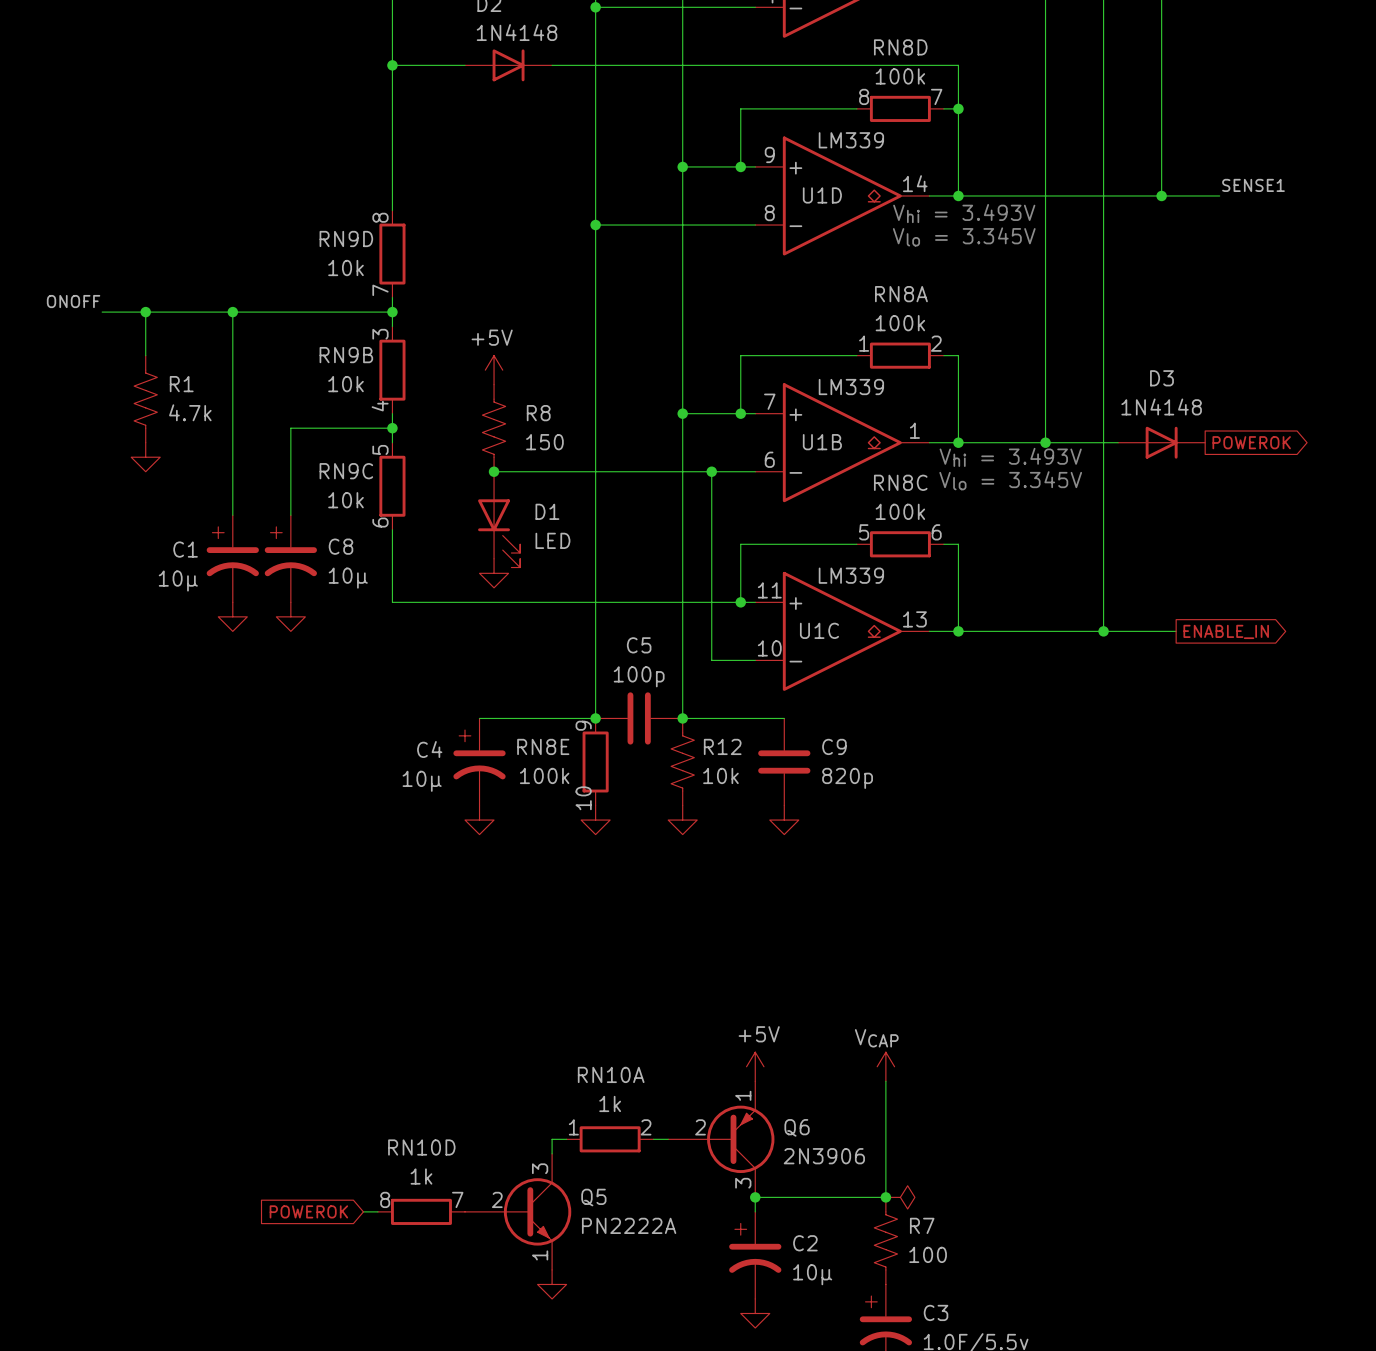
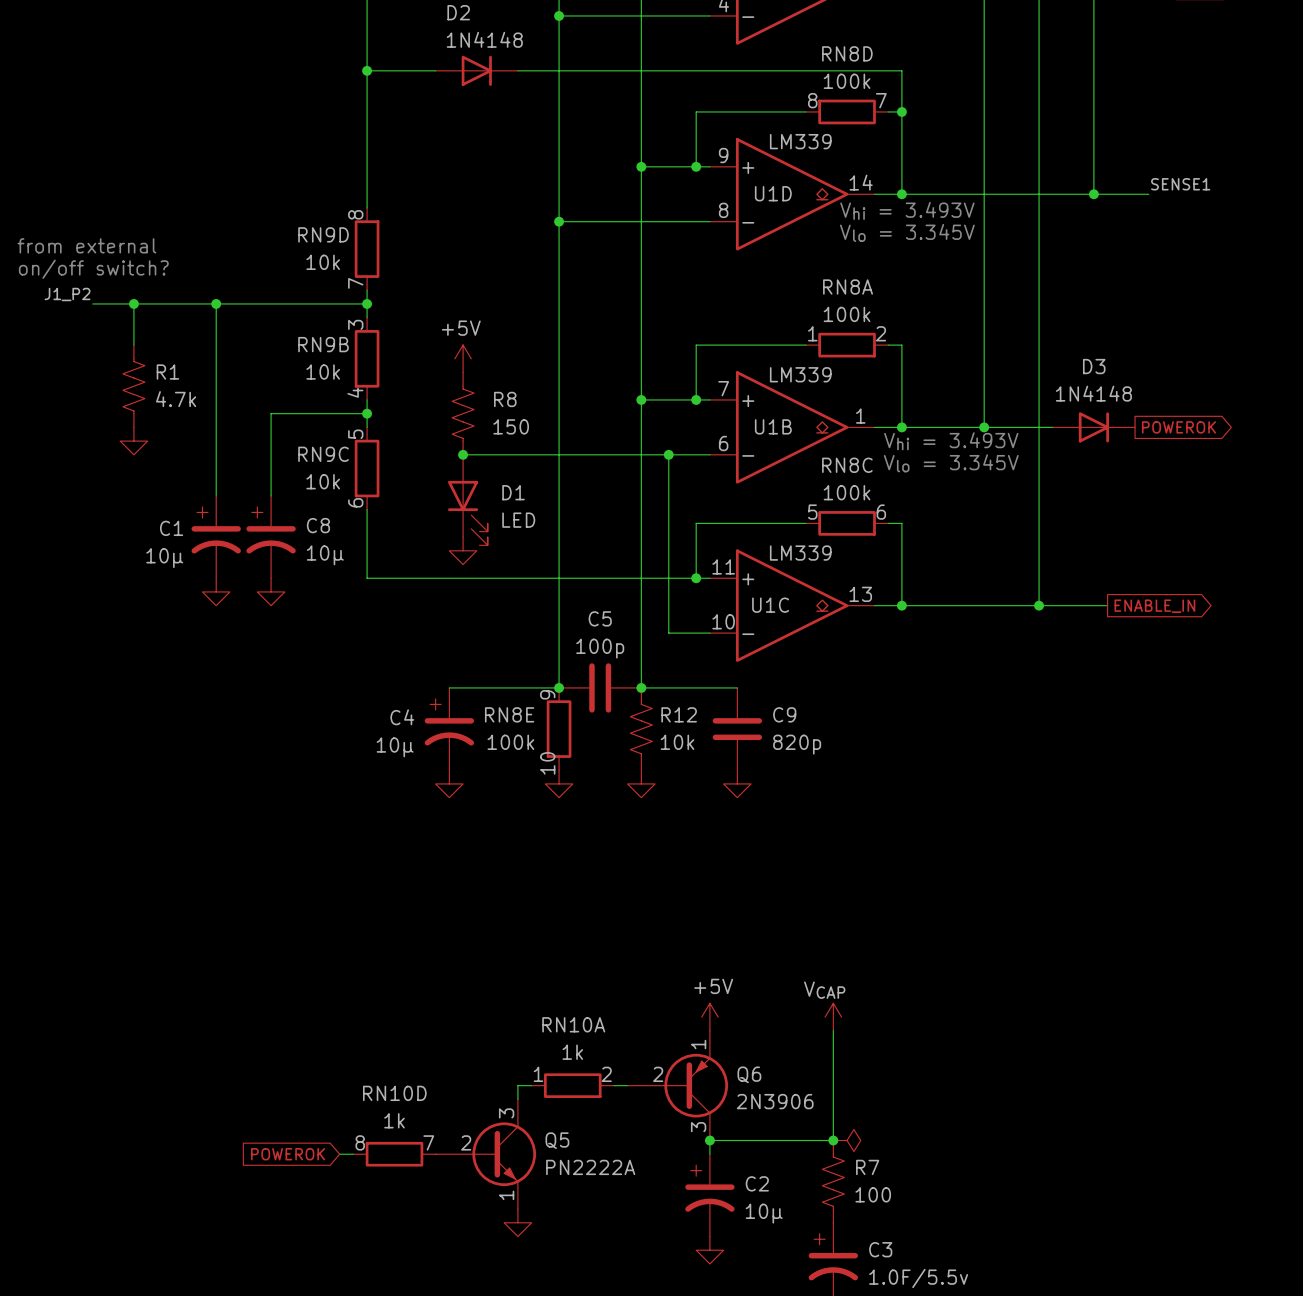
text: none -> from external (86, 245)
text: none -> on/off switch? (93, 269)
label: ONOFF (73, 301) -> J1_P2 (67, 294)

